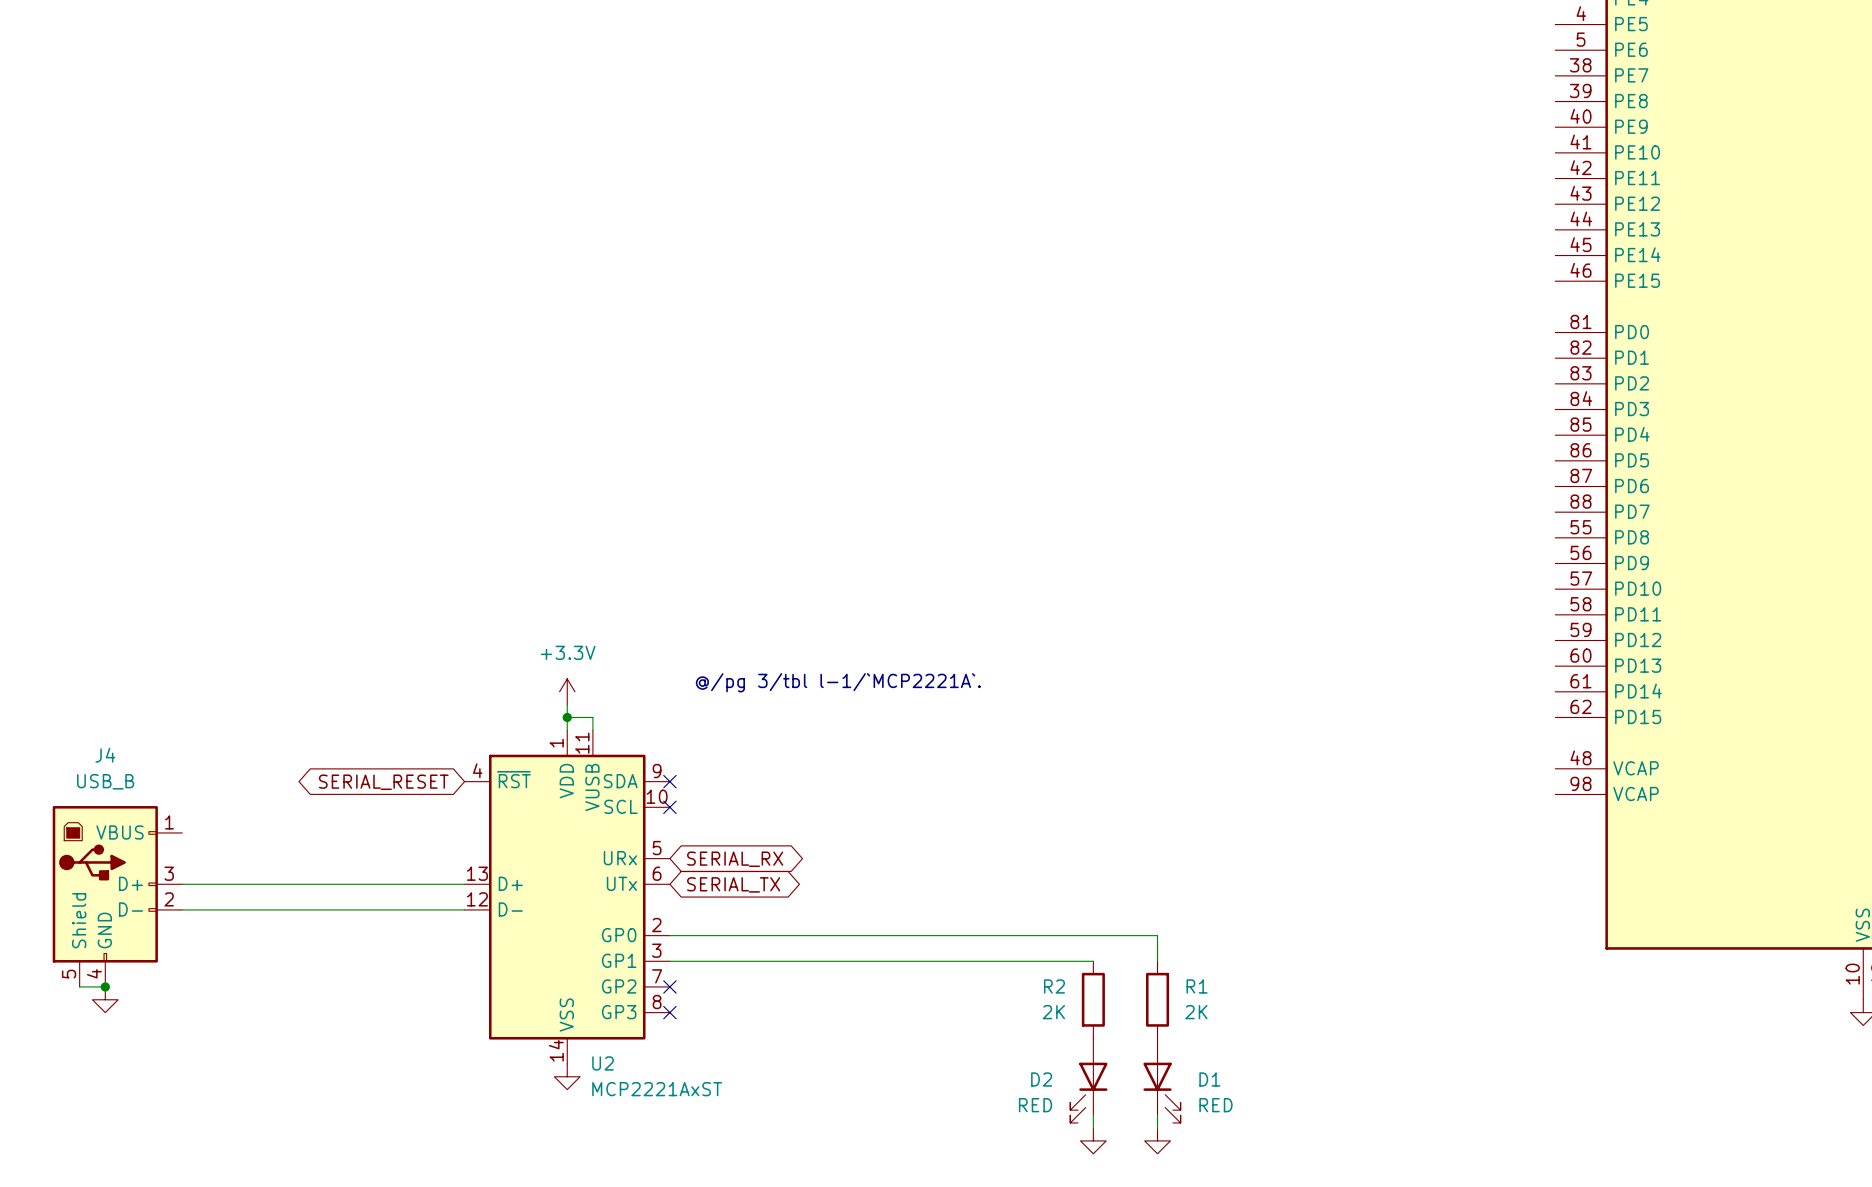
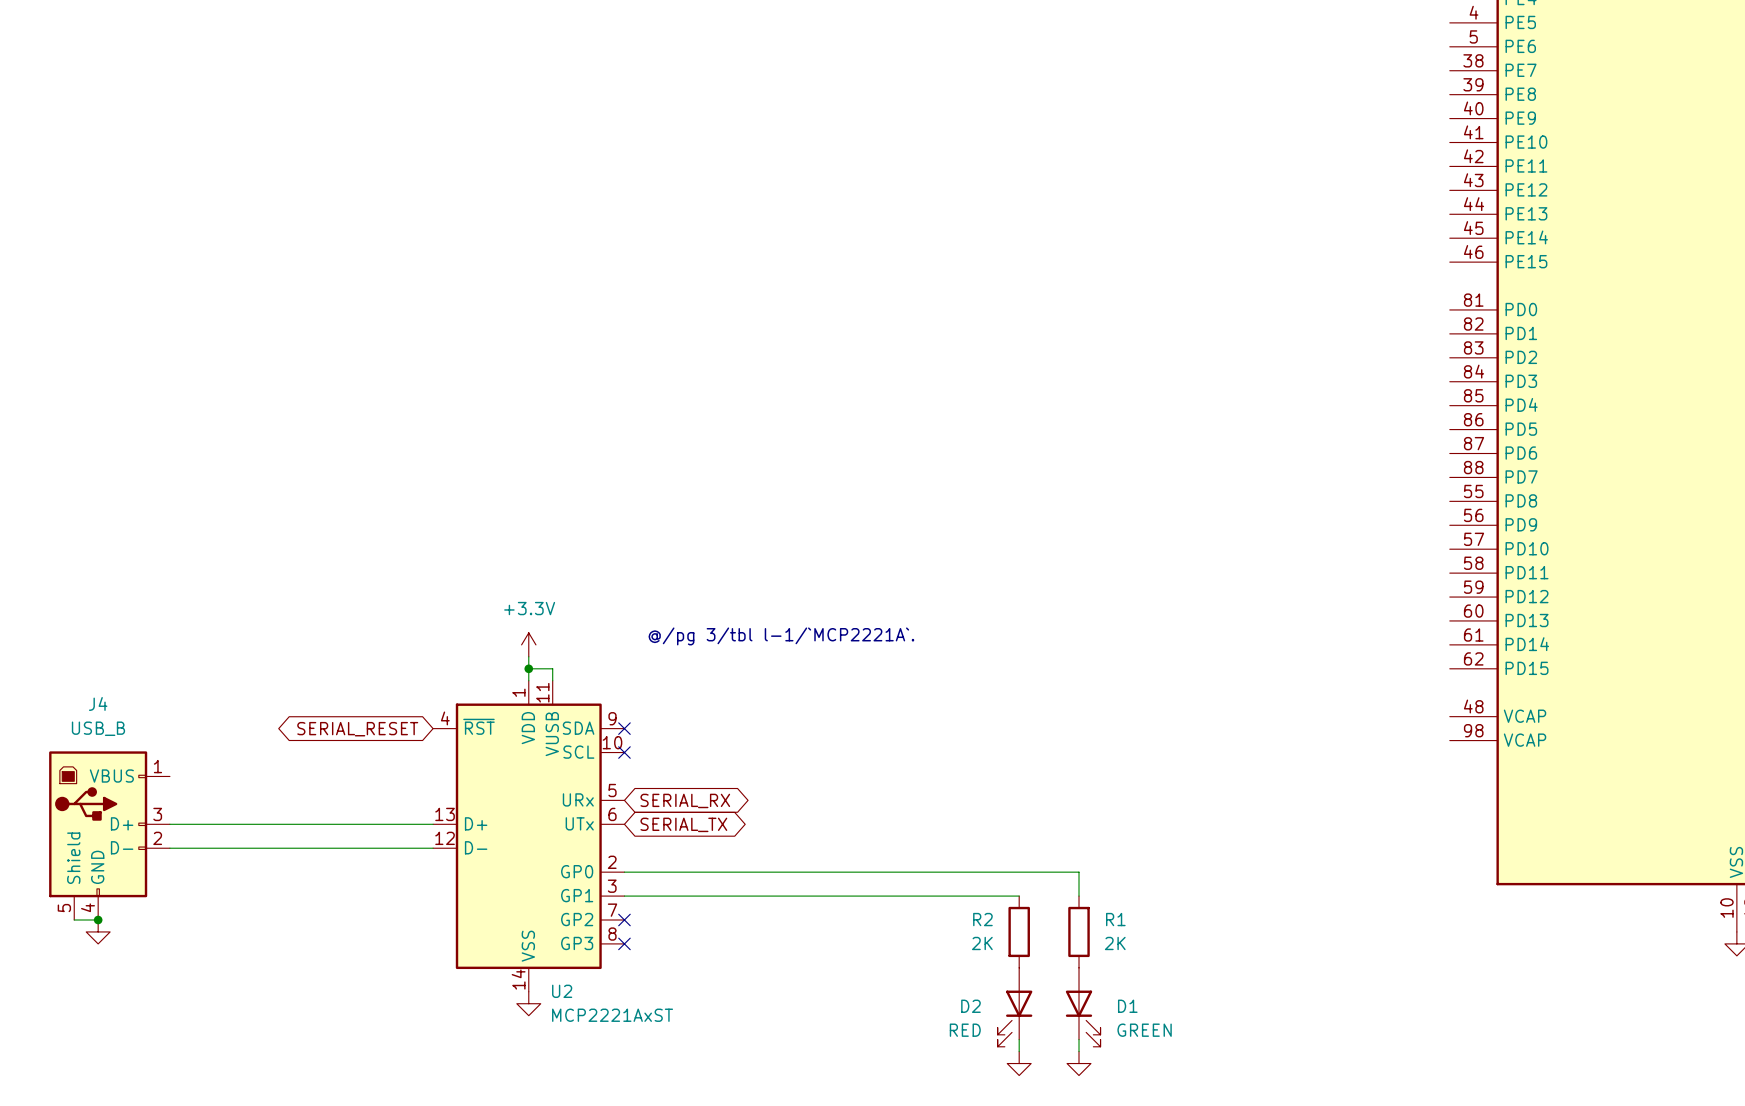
D1 value: RED (1215, 1105) -> GREEN (1144, 1030)

